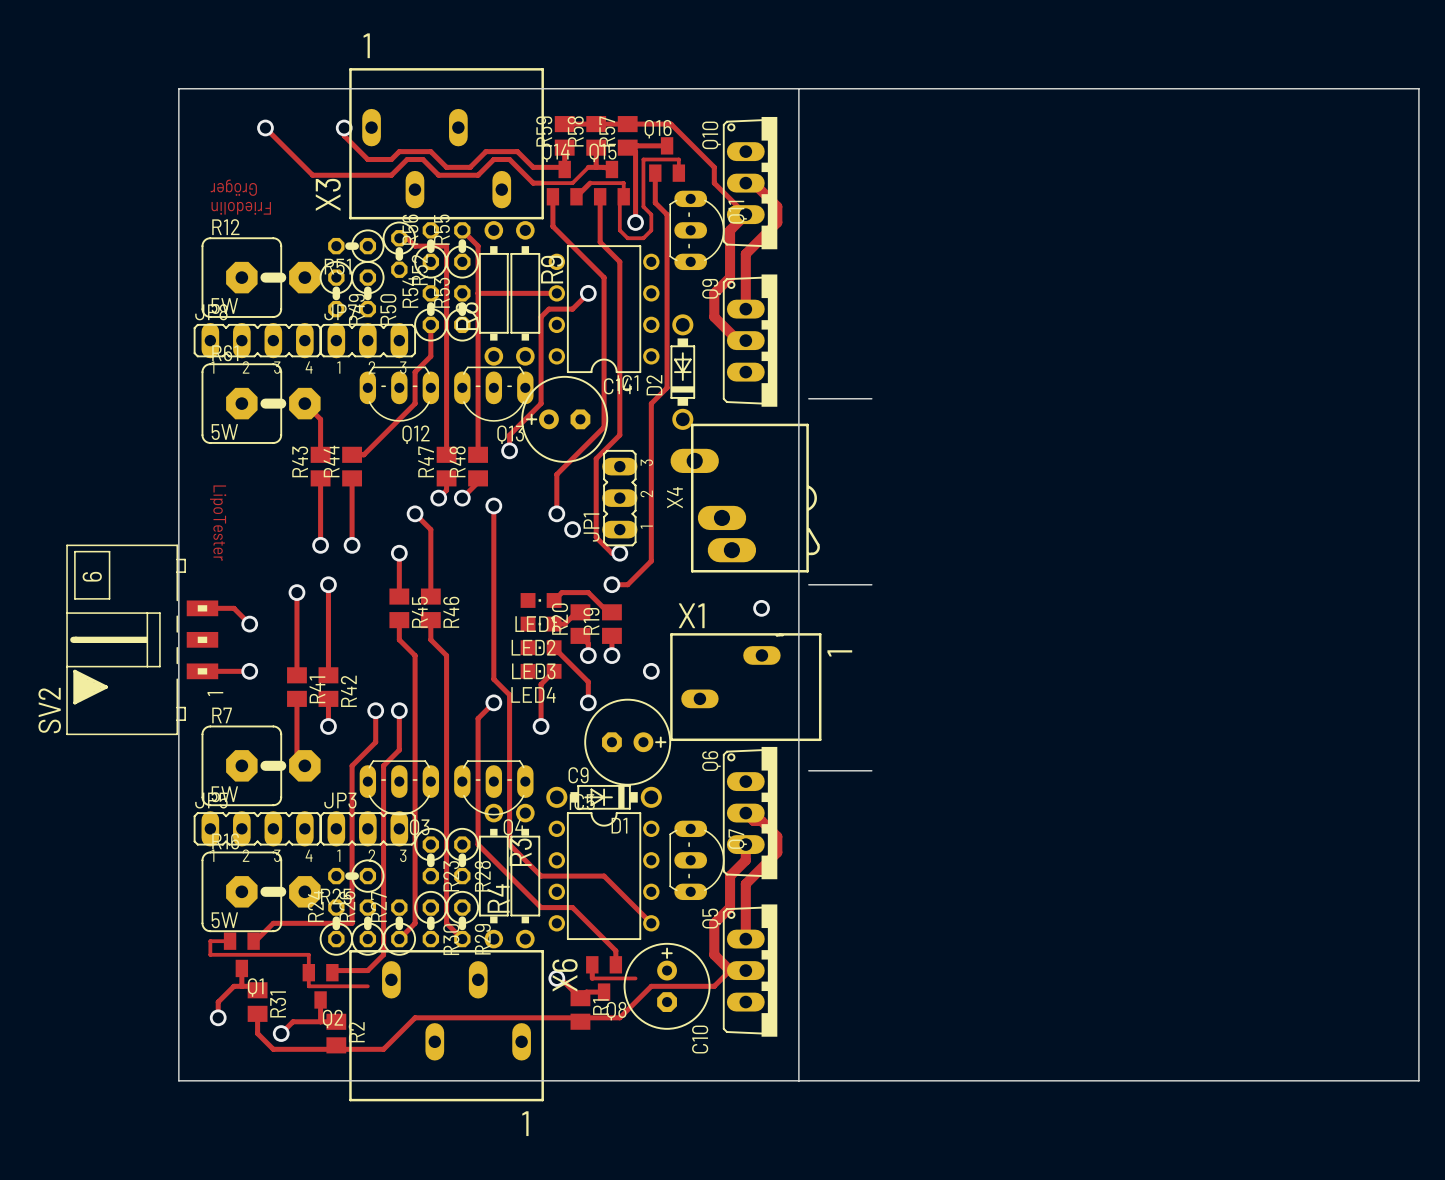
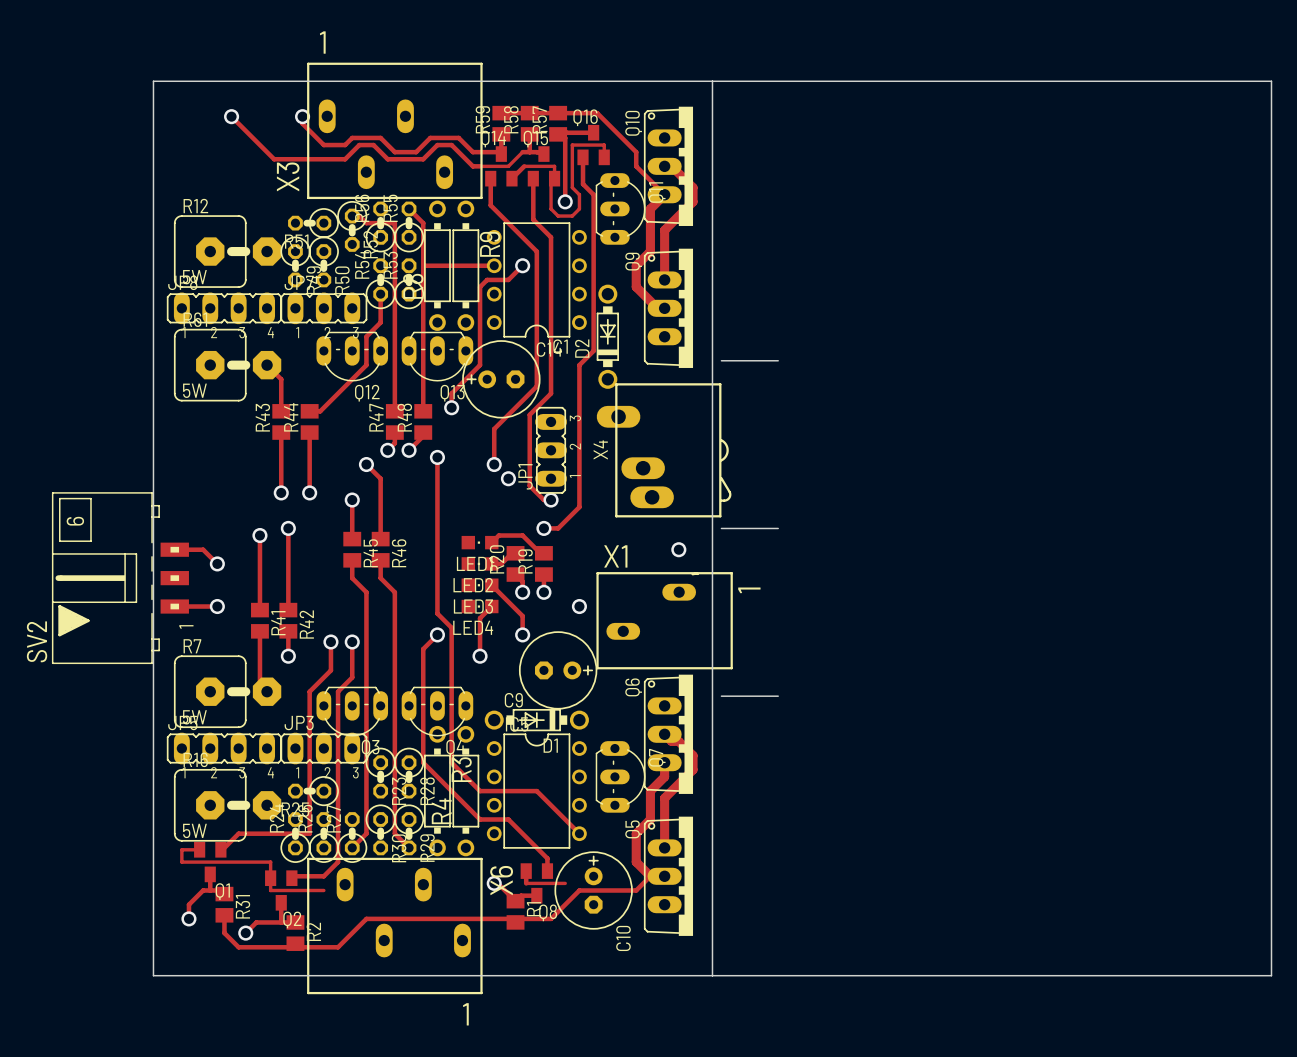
text: Gröger (233, 187) -> none
text: Friedolin (241, 208) -> none
text: LipoTester (218, 523) -> none

